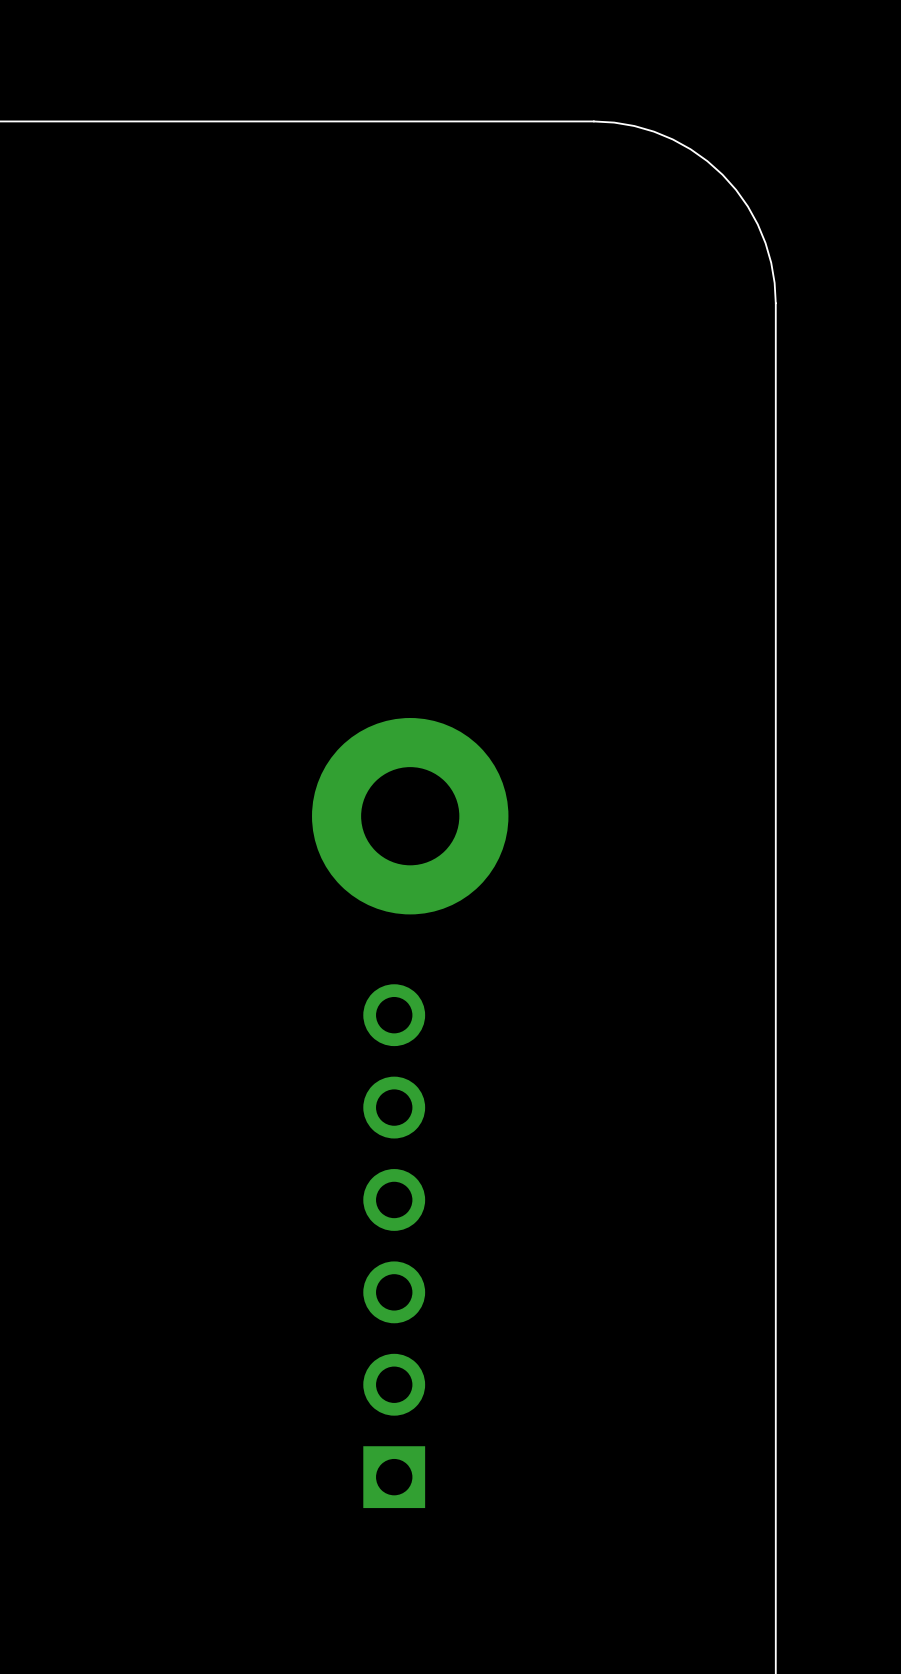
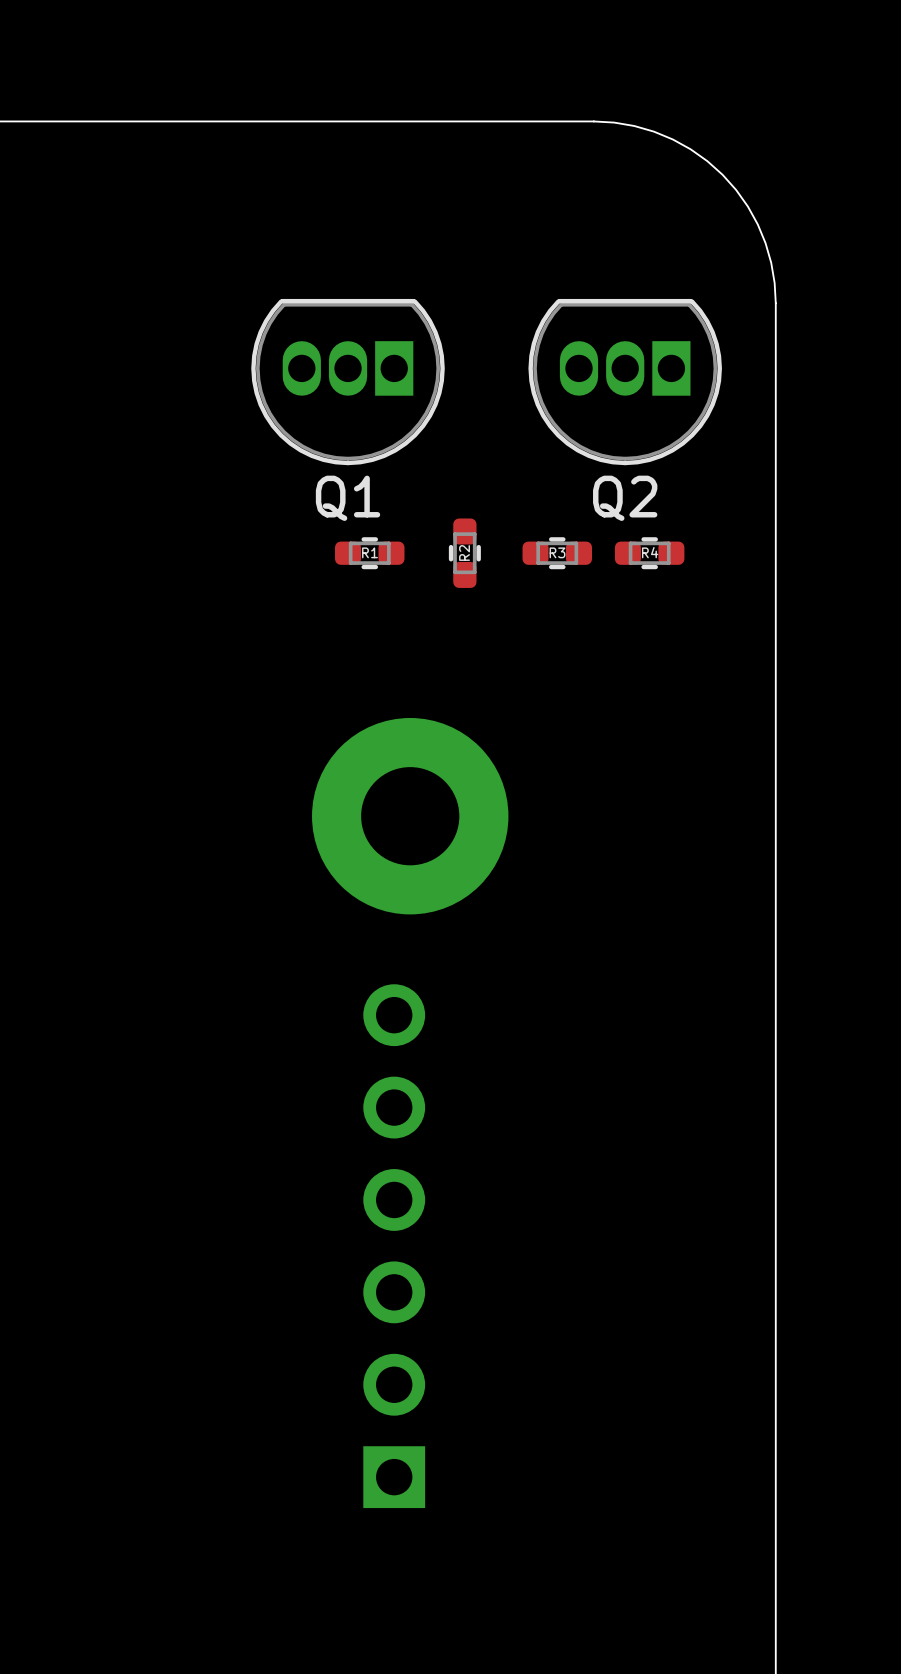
Q1: none -> (348, 382)
Q2: none -> (625, 382)
R1: none -> (369, 553)
R2: none -> (464, 553)
R3: none -> (557, 553)
R4: none -> (649, 553)

